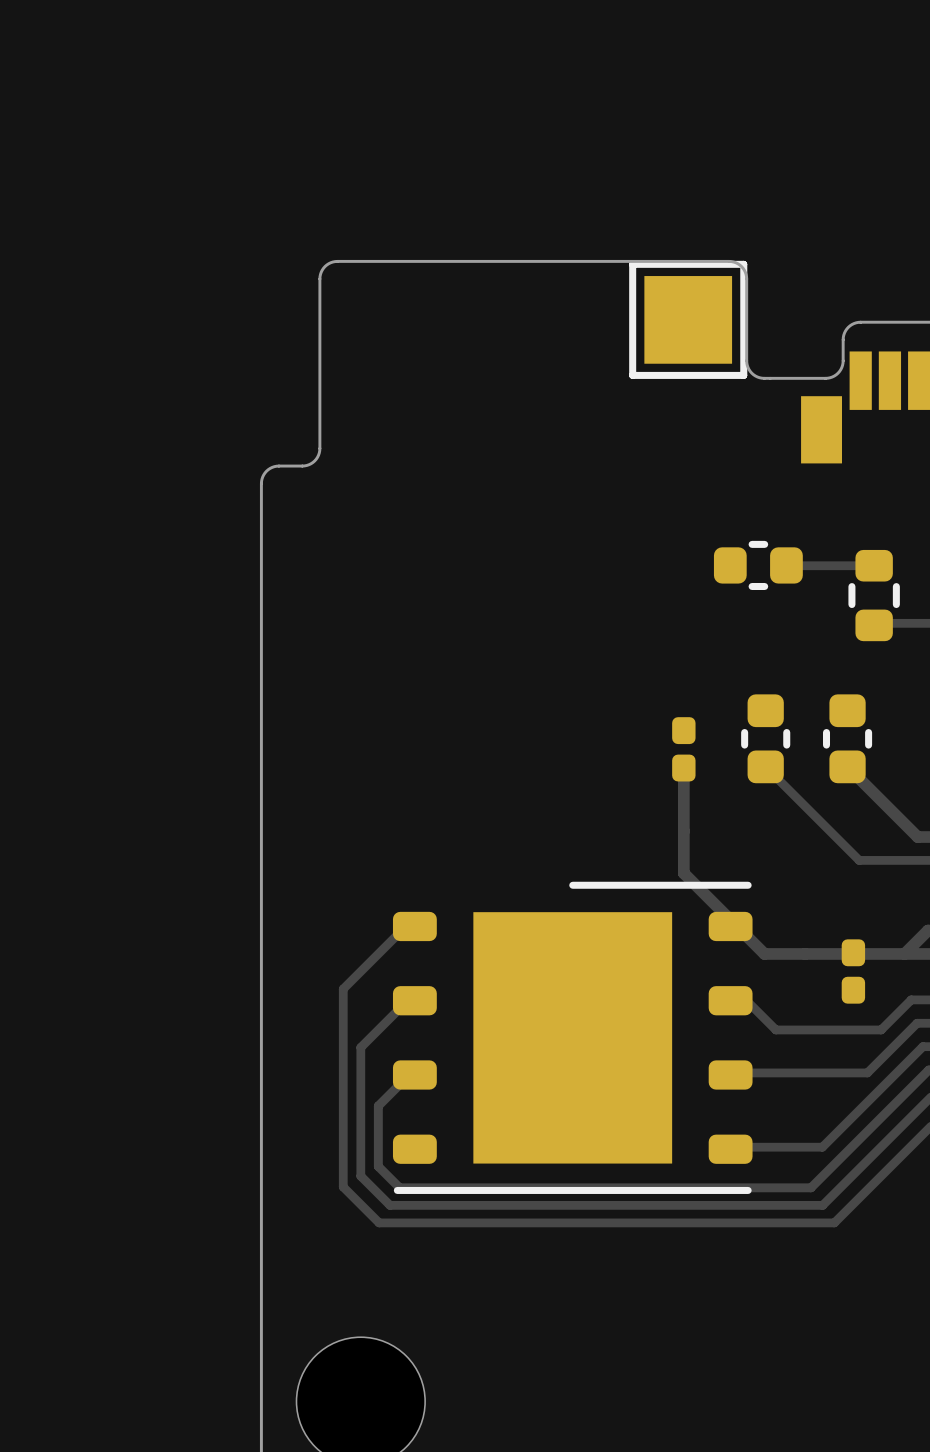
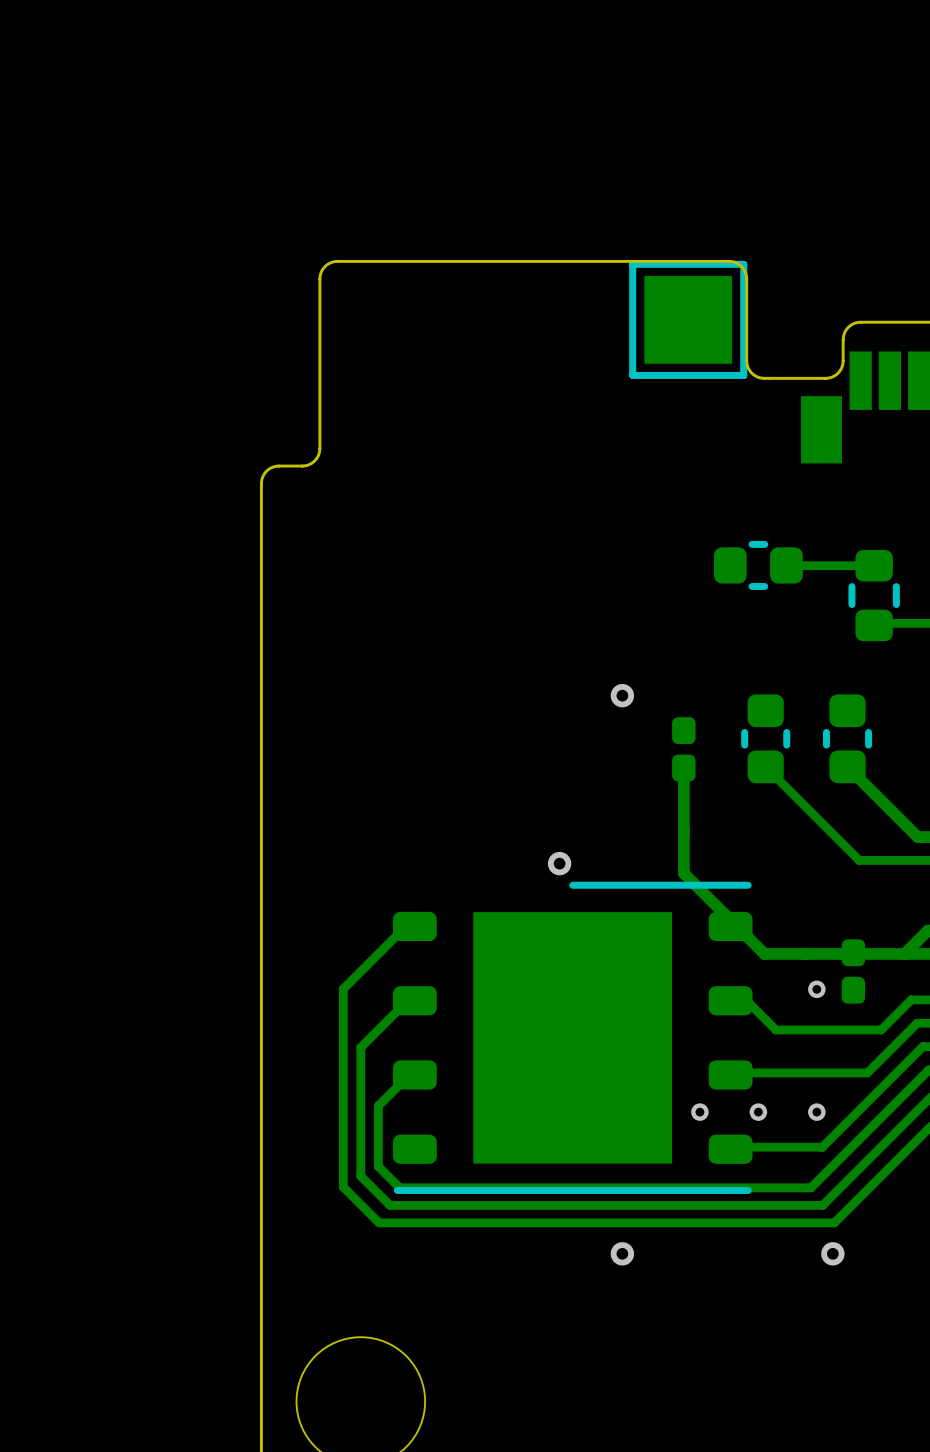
via: none -> (622, 695)
via: none -> (559, 863)
via: none -> (816, 989)
via: none -> (699, 1112)
via: none -> (758, 1112)
via: none -> (816, 1112)
via: none -> (622, 1253)
via: none -> (832, 1253)

